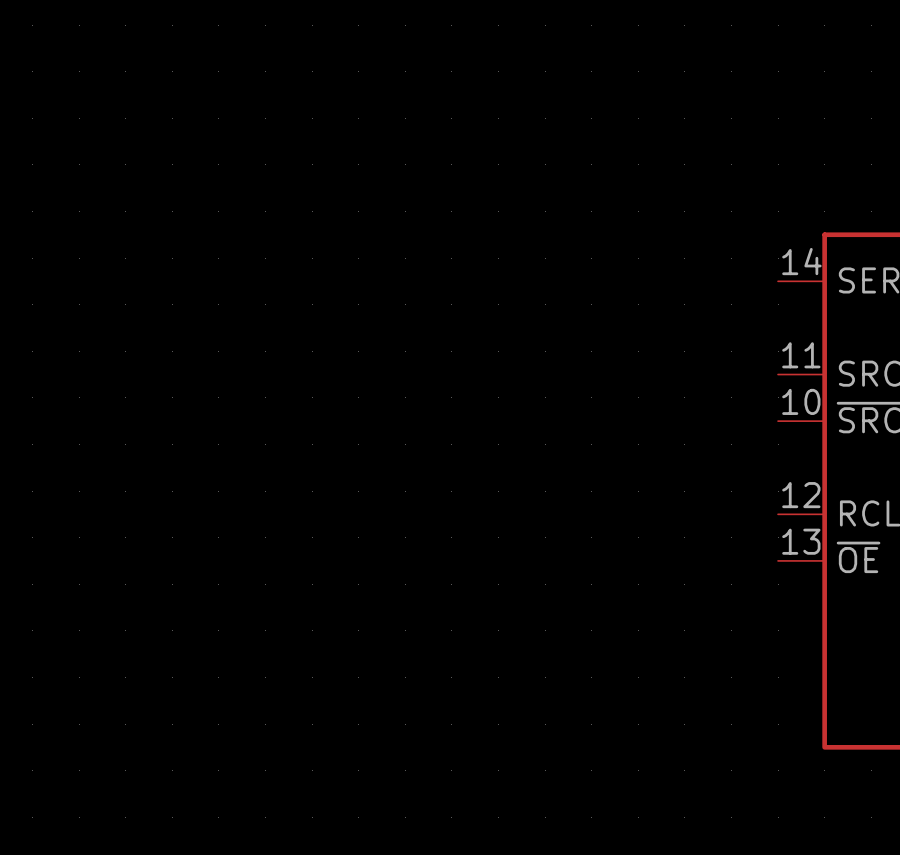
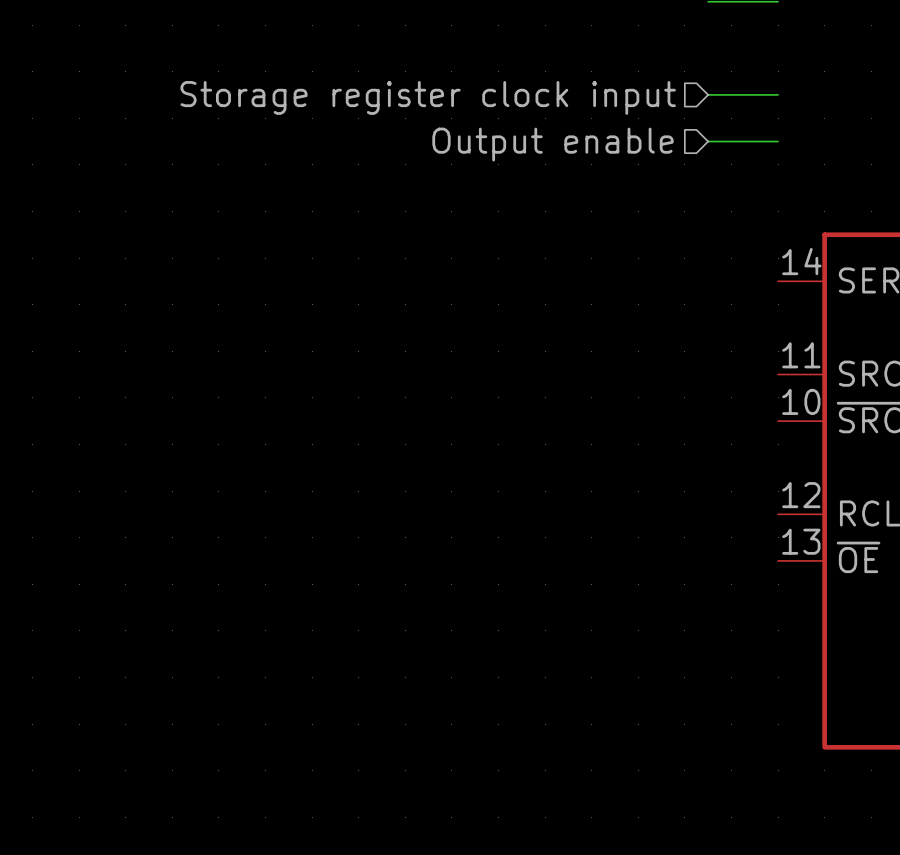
wire: none -> (708, 1) (778, 1)
wire: none -> (708, 94) (778, 94)
hierarchical label: none -> Storage register clock input (428, 97)
wire: none -> (708, 141) (778, 141)
hierarchical label: none -> Output enable (552, 144)

